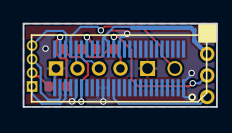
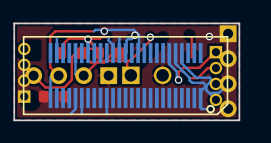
drawing: [198, 23, 218, 43] -> none
bottom track: (131, 27) (191, 27) (194, 30) (191, 26) (114, 26) (103, 37) (103, 49) -> none
bottom track: none -> (93, 31) (133, 29) (139, 35) (138, 53)
top track: none -> (93, 31) (55, 31) (50, 36) (50, 67) (58, 75)
bottom track: (100, 30) (97, 26) (80, 26) (70, 36) (70, 49) -> none
top track: (100, 30) (104, 26) (141, 26) (161, 46) (161, 54) (175, 68) -> none
bottom track: (194, 30) (194, 41) (207, 53) -> none
top track: (127, 33) (123, 30) (110, 30) (106, 34) -> none
via: none -> (209, 36)
top track: none -> (106, 37) (68, 38) (64, 42) (64, 48)
top track: none -> (150, 37) (150, 40) (130, 60) (98, 60) (83, 75)
top track: none -> (191, 37) (191, 57)
top track: (113, 36) (118, 36) (131, 49) (131, 79) (138, 86) (189, 86) (192, 83) -> none
via position: (113, 36) -> (150, 37)
top track: (60, 37) (56, 40) (56, 54) (60, 58) (66, 59) (66, 86) -> none
via: (60, 37) -> none
bottom track: (32, 45) (46, 30) (63, 30) (66, 34) (65, 49) -> none
top track: none -> (101, 48) (80, 48) (71, 57) (71, 79) (64, 87) (45, 87) (33, 75)
via: (45, 48) -> none
top track: none -> (215, 52) (199, 67) (183, 67) (178, 72) (178, 80)
top track: (63, 49) (70, 57) (81, 57) (87, 63) (87, 74) (81, 81) (81, 101) -> none
bottom track: (81, 49) (81, 57) (84, 61) (91, 61) (98, 68) -> none
bottom track: none -> (169, 53) (169, 64) (176, 71) (178, 80)
bottom track: none -> (175, 53) (175, 63) (183, 71)
bottom track: none -> (181, 61) (196, 77) (209, 77) (215, 83)
bottom track: (32, 59) (40, 67) (40, 92) (48, 99) (58, 99) (60, 87) -> none
top track: none -> (215, 68) (207, 68) (197, 78) (191, 78)
bottom track: none -> (183, 71) (192, 82) (203, 82) (206, 85) (206, 90) (215, 99)
part rotation: 0° (88, 68) -> 180° (71, 75)
part position: (161, 68) -> (146, 75)
part: none -> (215, 76)
top track: (32, 72) (48, 86) -> none
via: none -> (178, 80)
via: (191, 73) -> none
via: (192, 83) -> none
bottom track: (32, 86) (32, 93) (41, 103) (60, 103) (65, 98) (65, 87) -> none
bottom track: (113, 87) (113, 98) (118, 103) (200, 103) (207, 96) -> none
via: (71, 101) -> none
via: (81, 101) -> none
via: (103, 101) -> none

